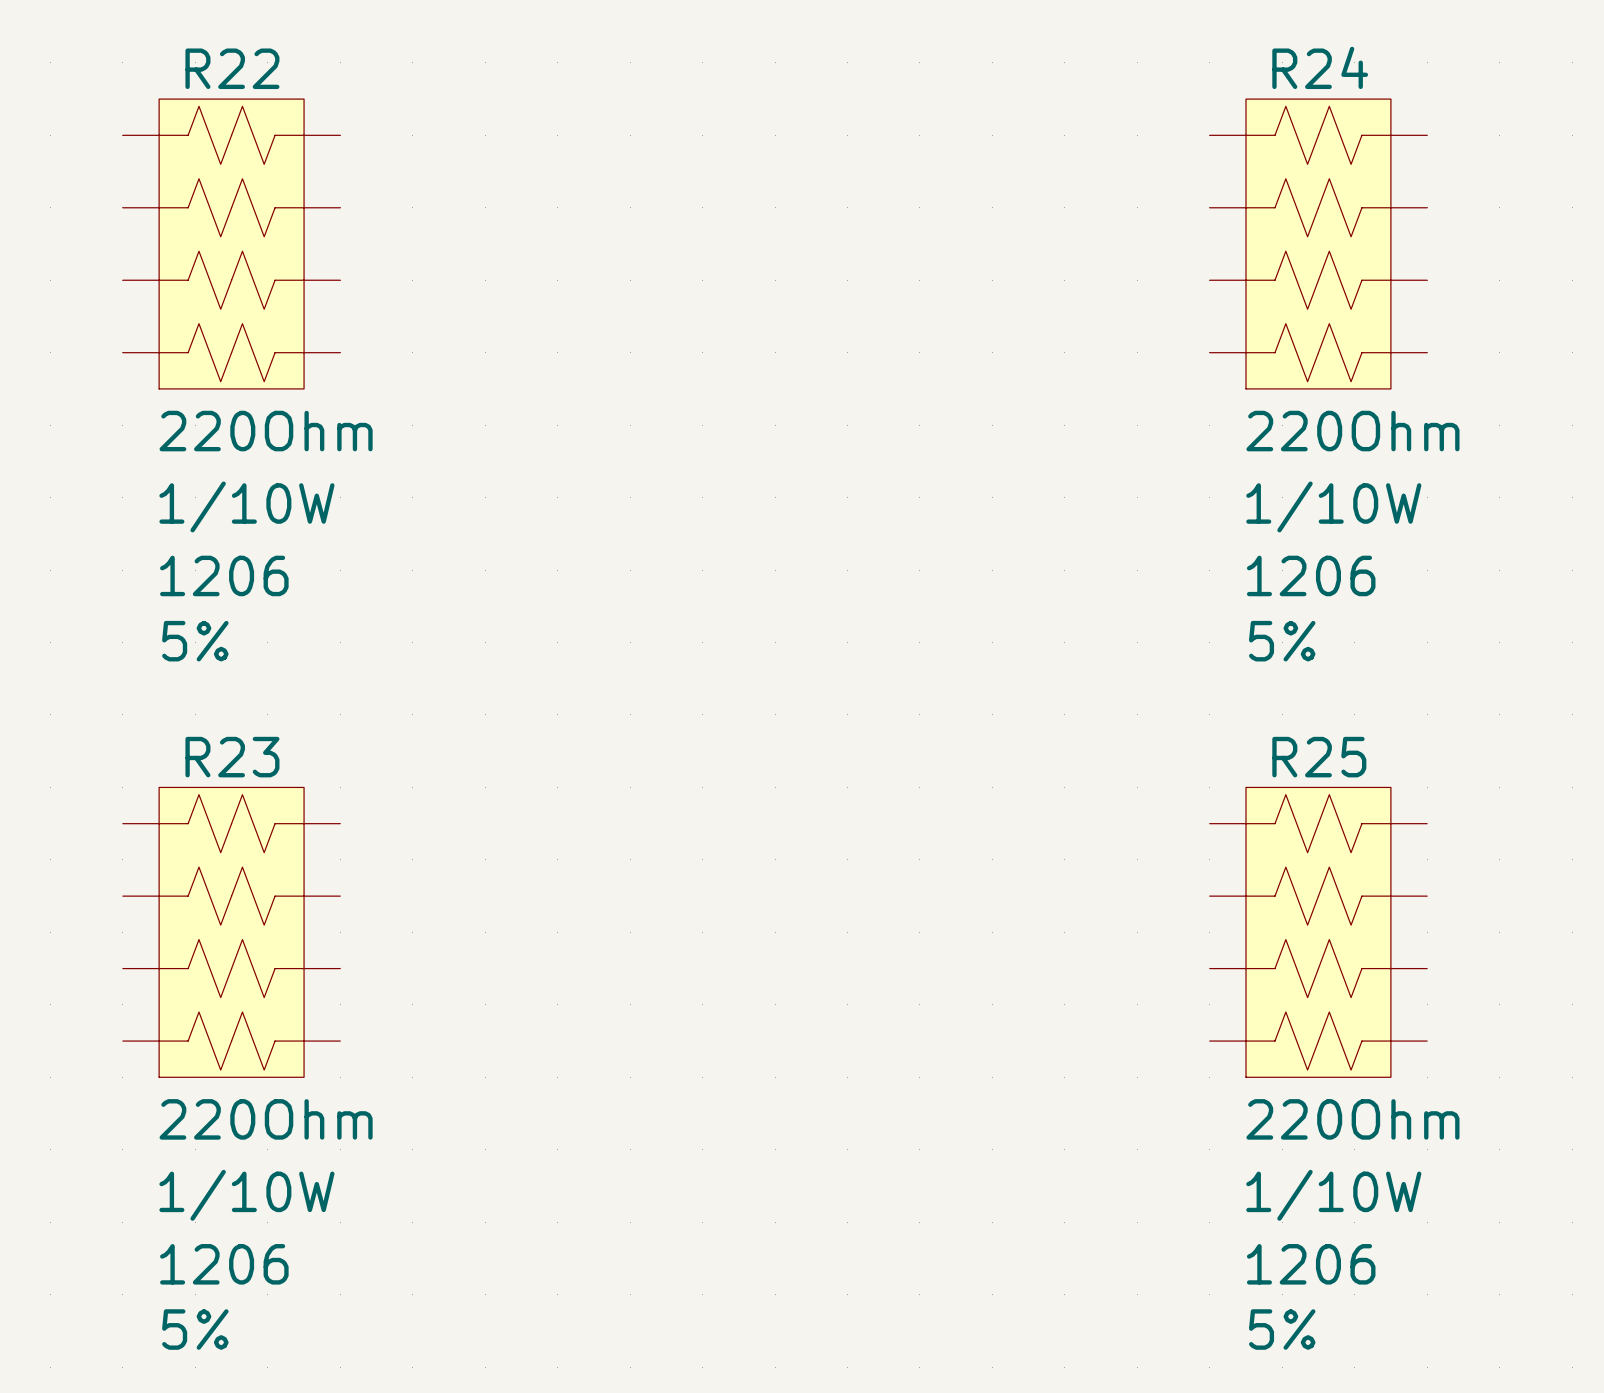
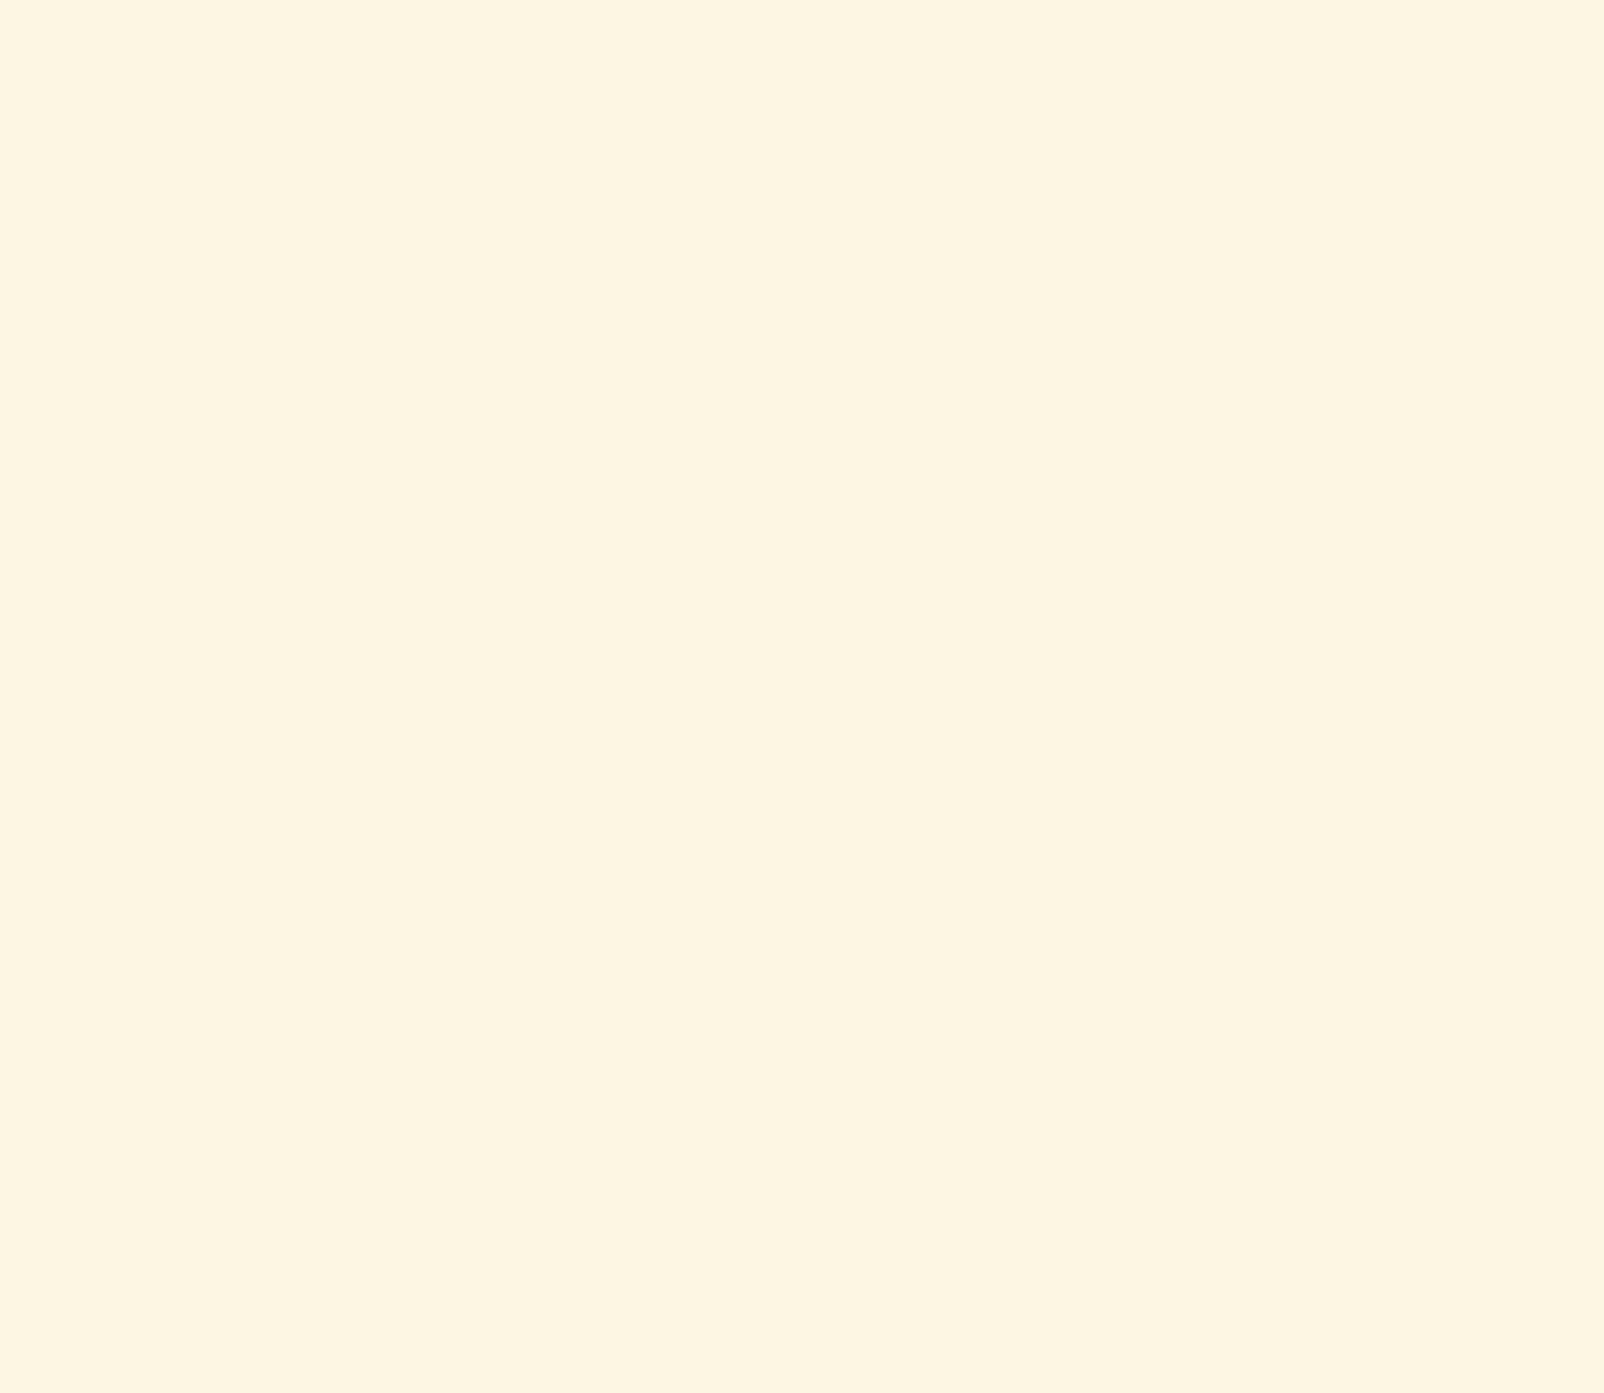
R22: 220Ohm (231, 244) -> none
R24: 220Ohm (1318, 244) -> none
R23: 220Ohm (231, 932) -> none
R25: 220Ohm (1318, 932) -> none

